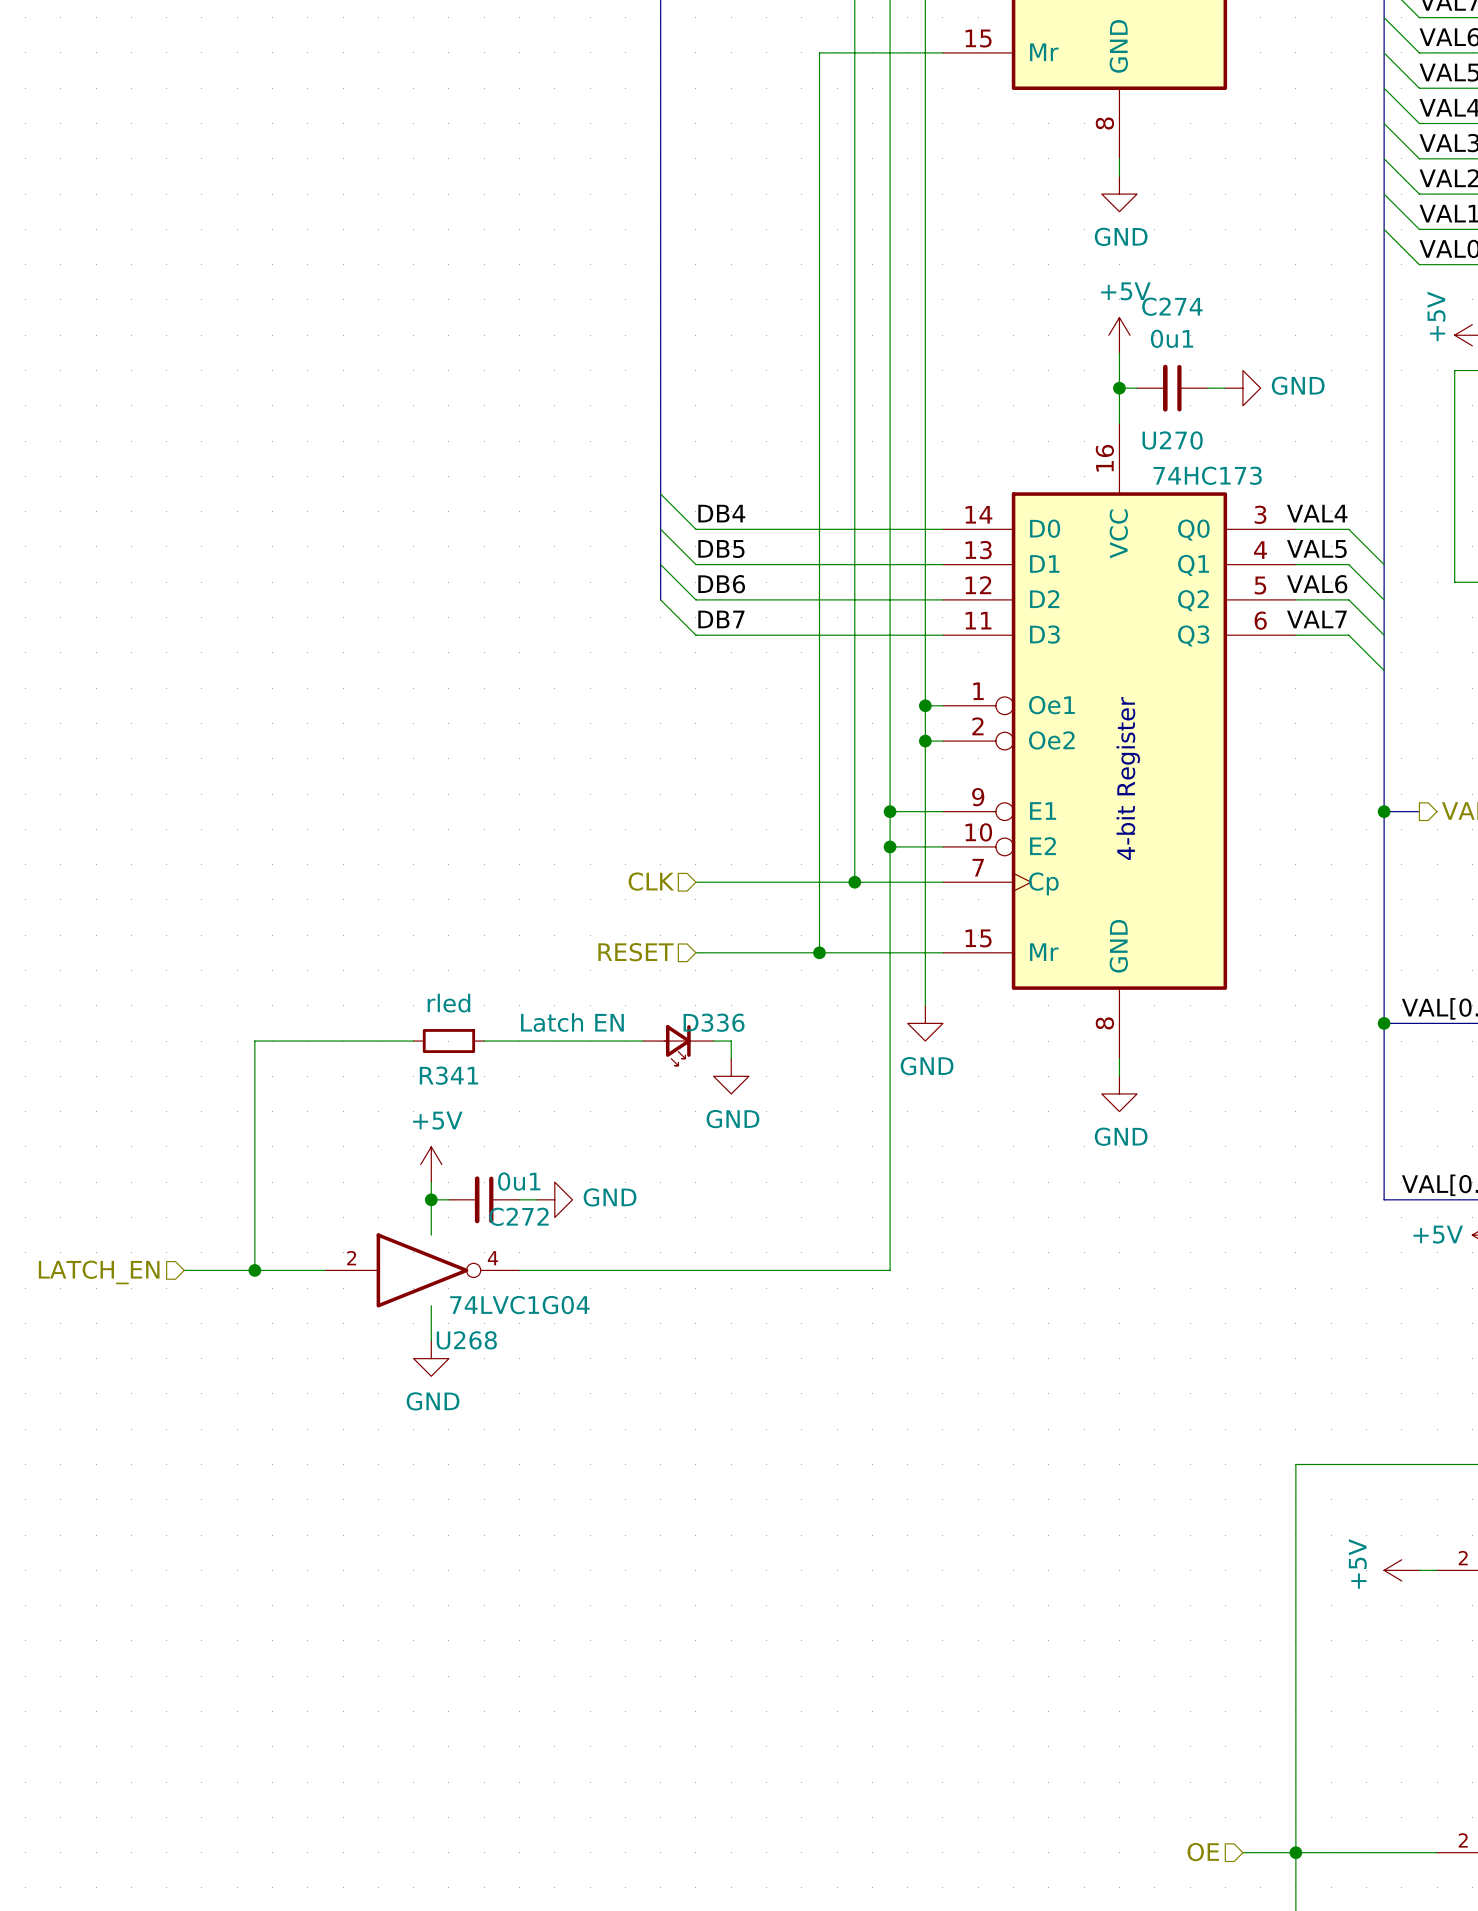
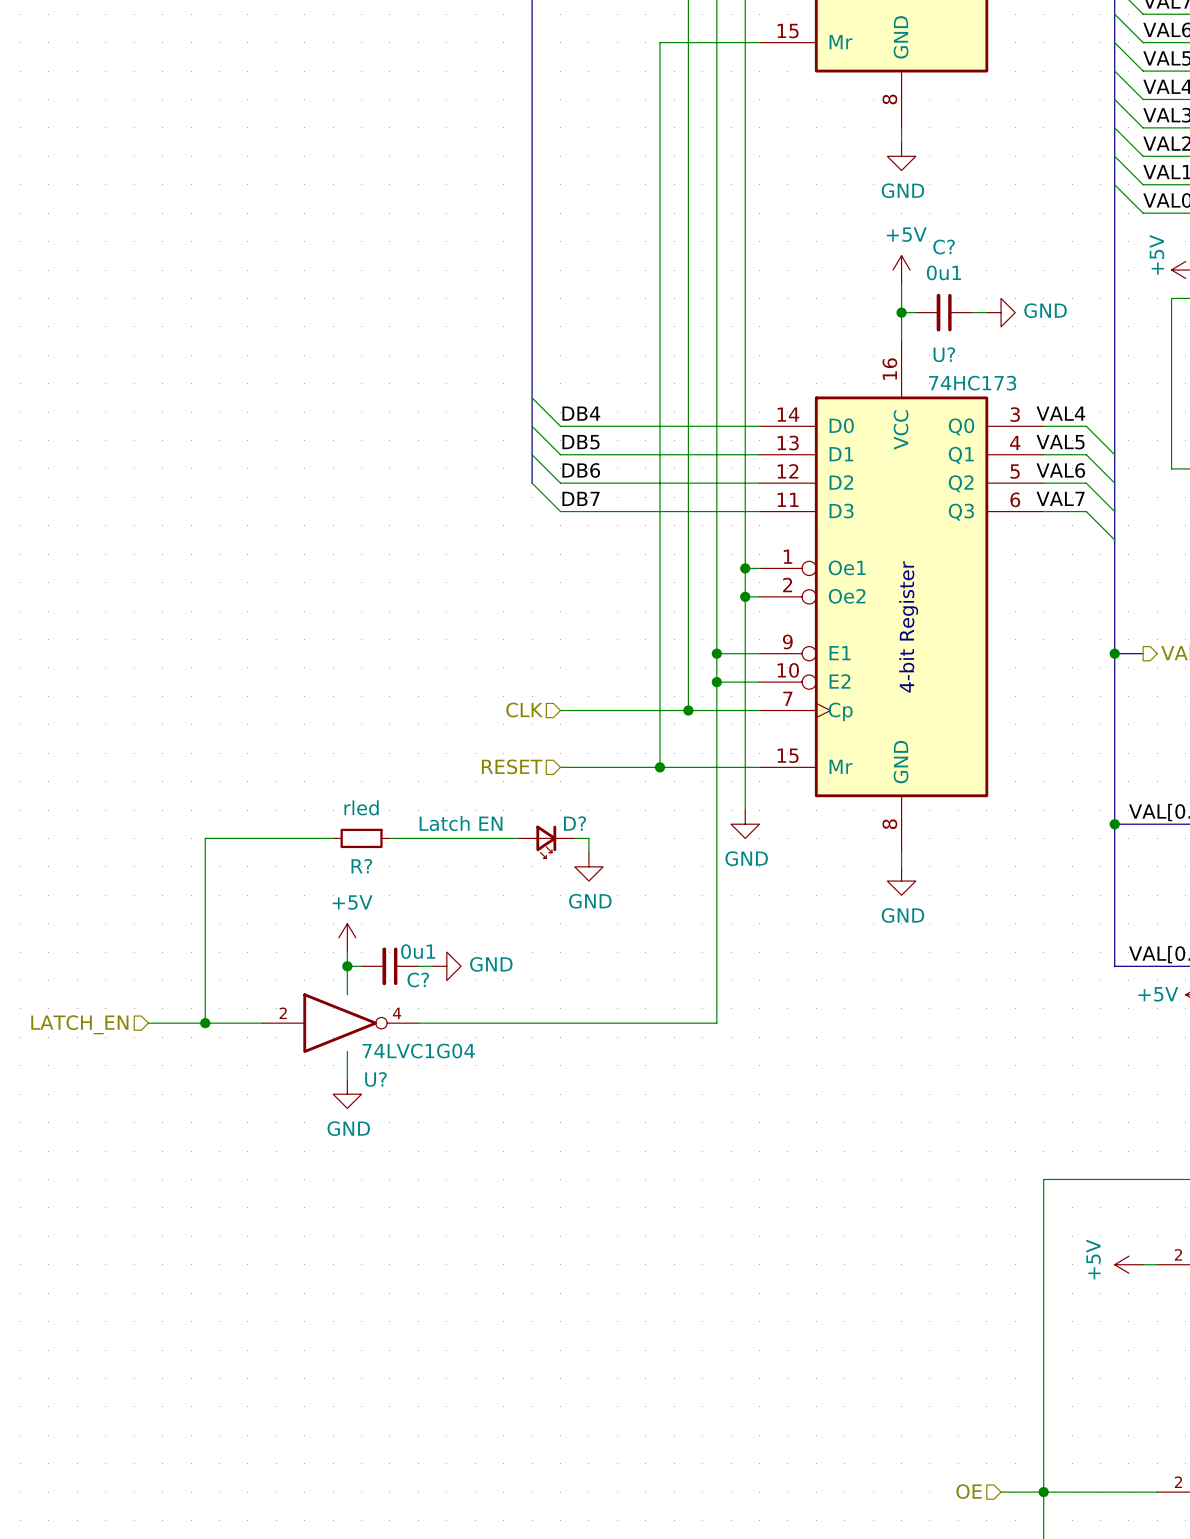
C274 name: C274 (1172, 306) -> C? (944, 247)
U270 name: U270 (1172, 440) -> U? (944, 354)
D336 name: D336 (714, 1022) -> D? (575, 823)
R341 name: R341 (449, 1075) -> R? (361, 866)
C272 name: C272 (518, 1216) -> C? (418, 980)
U268 name: U268 (466, 1340) -> U? (375, 1079)

